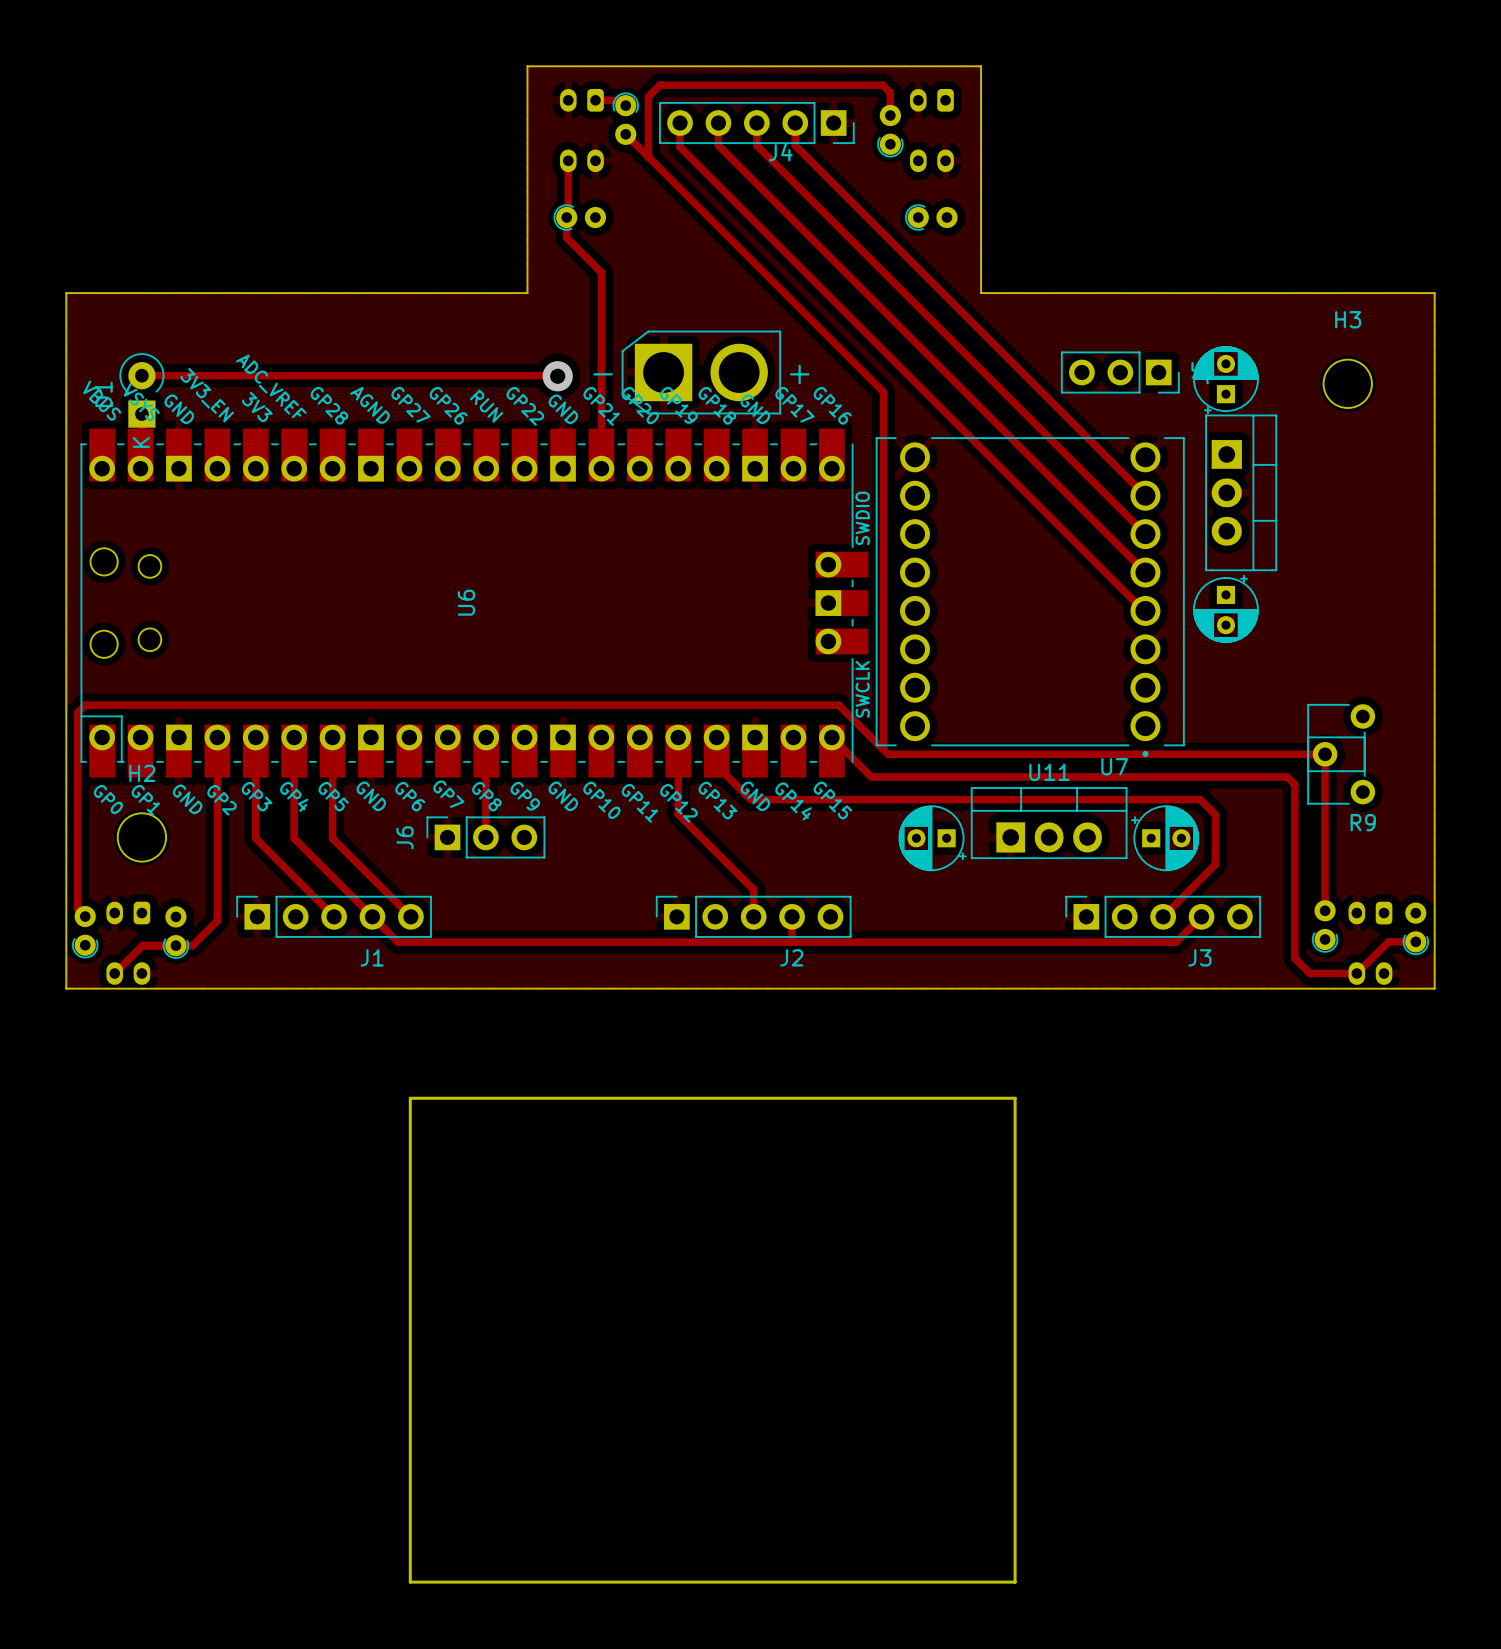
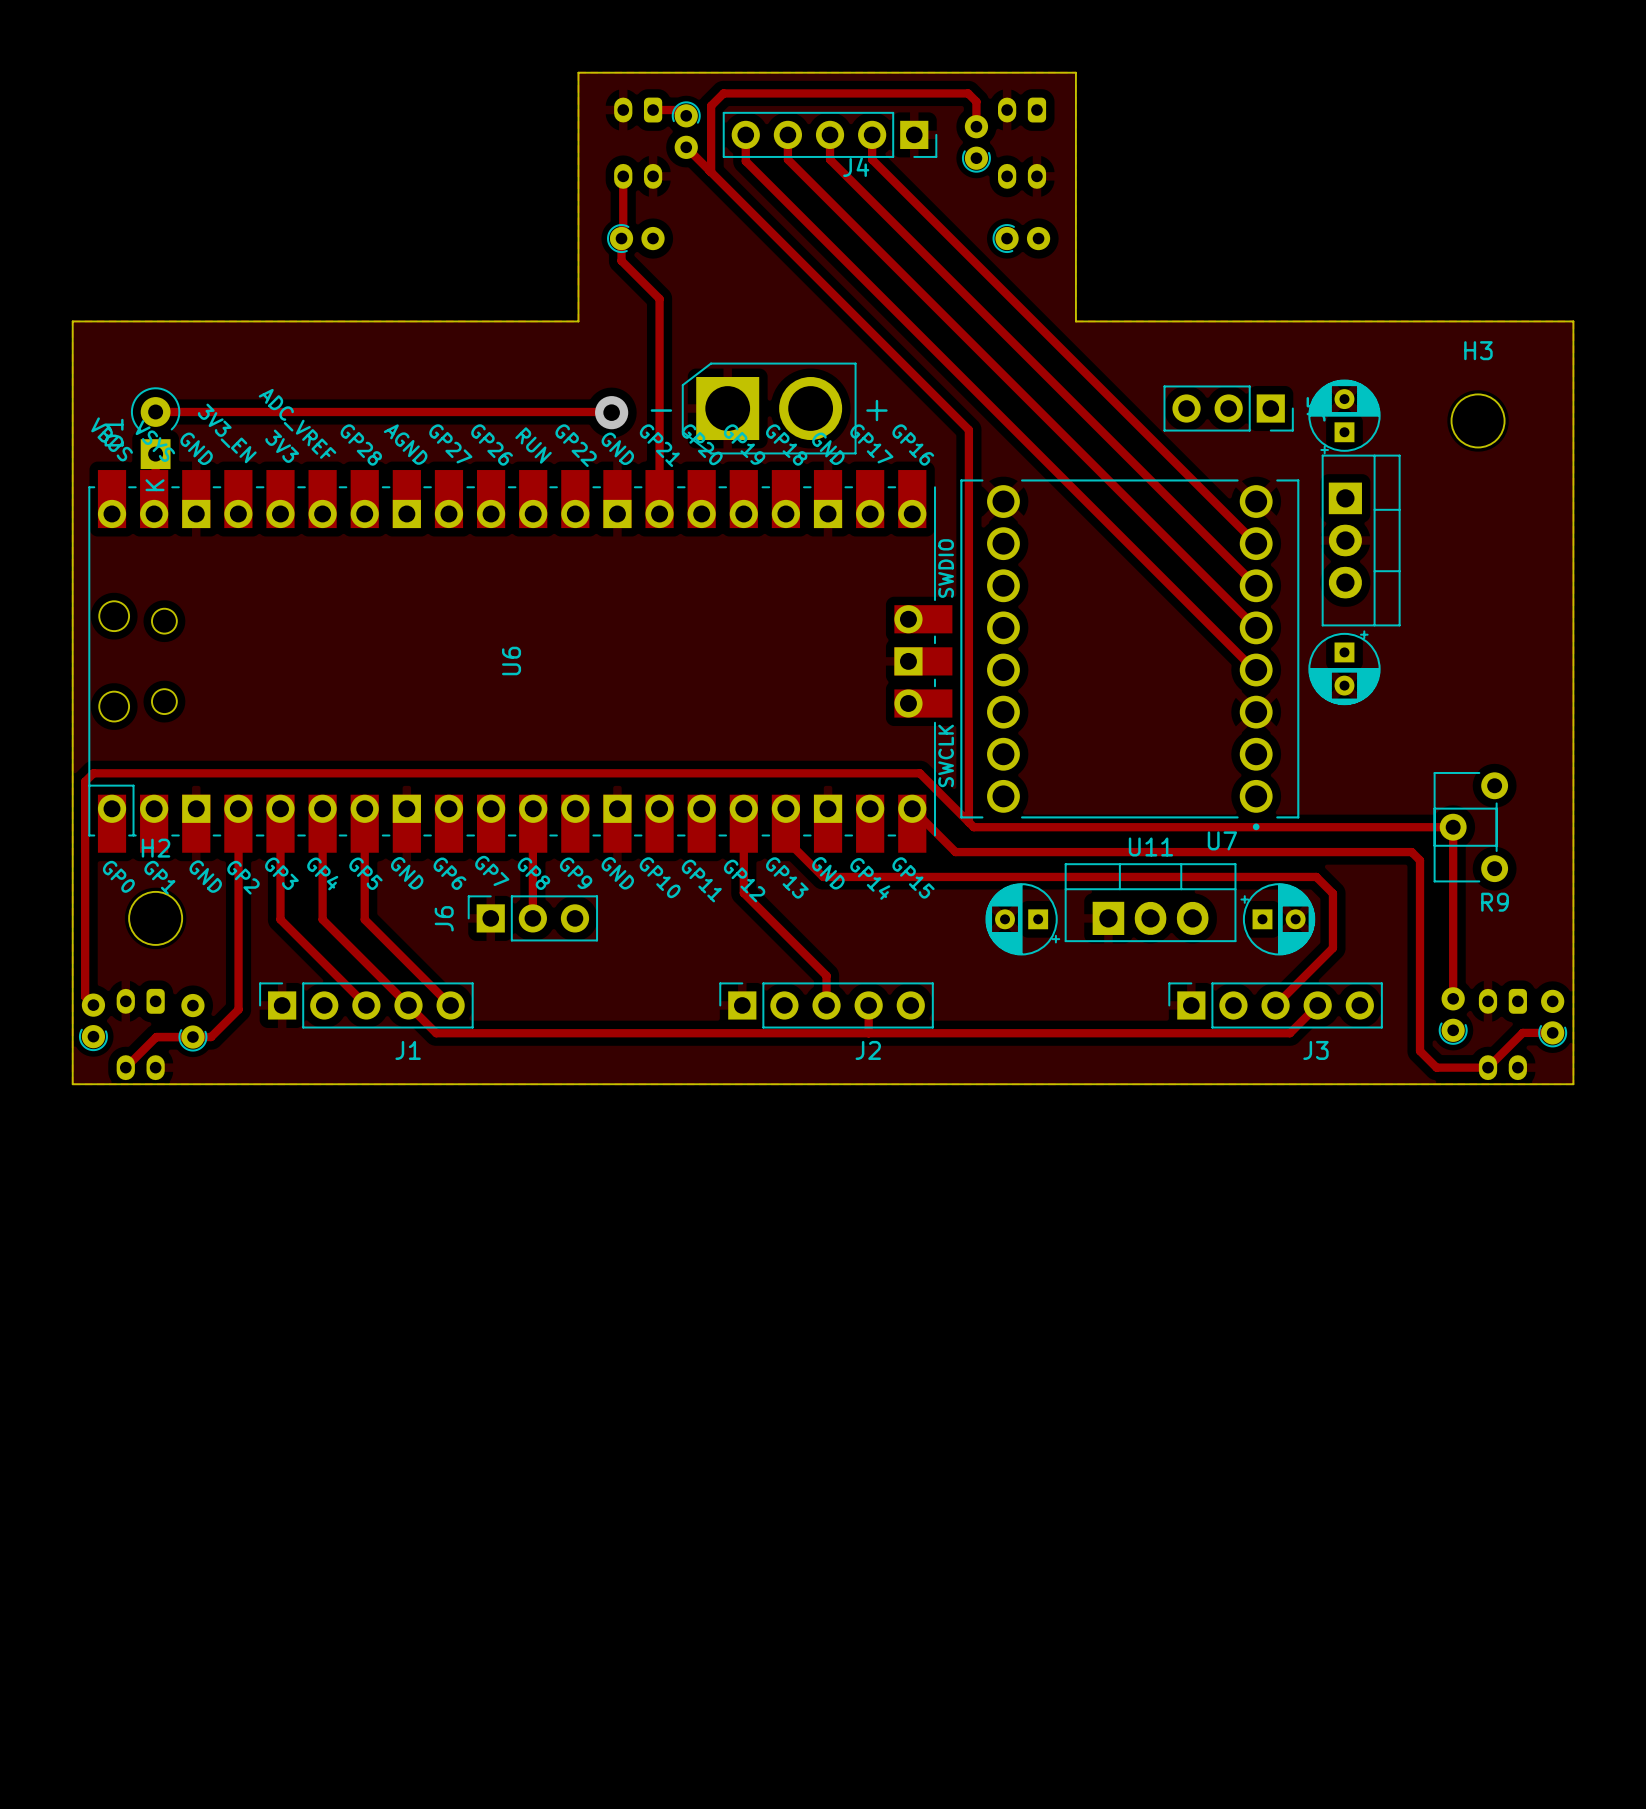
board edge: (410, 1098) (1015, 1098) (1015, 1582) (410, 1582) (410, 1098) -> none

